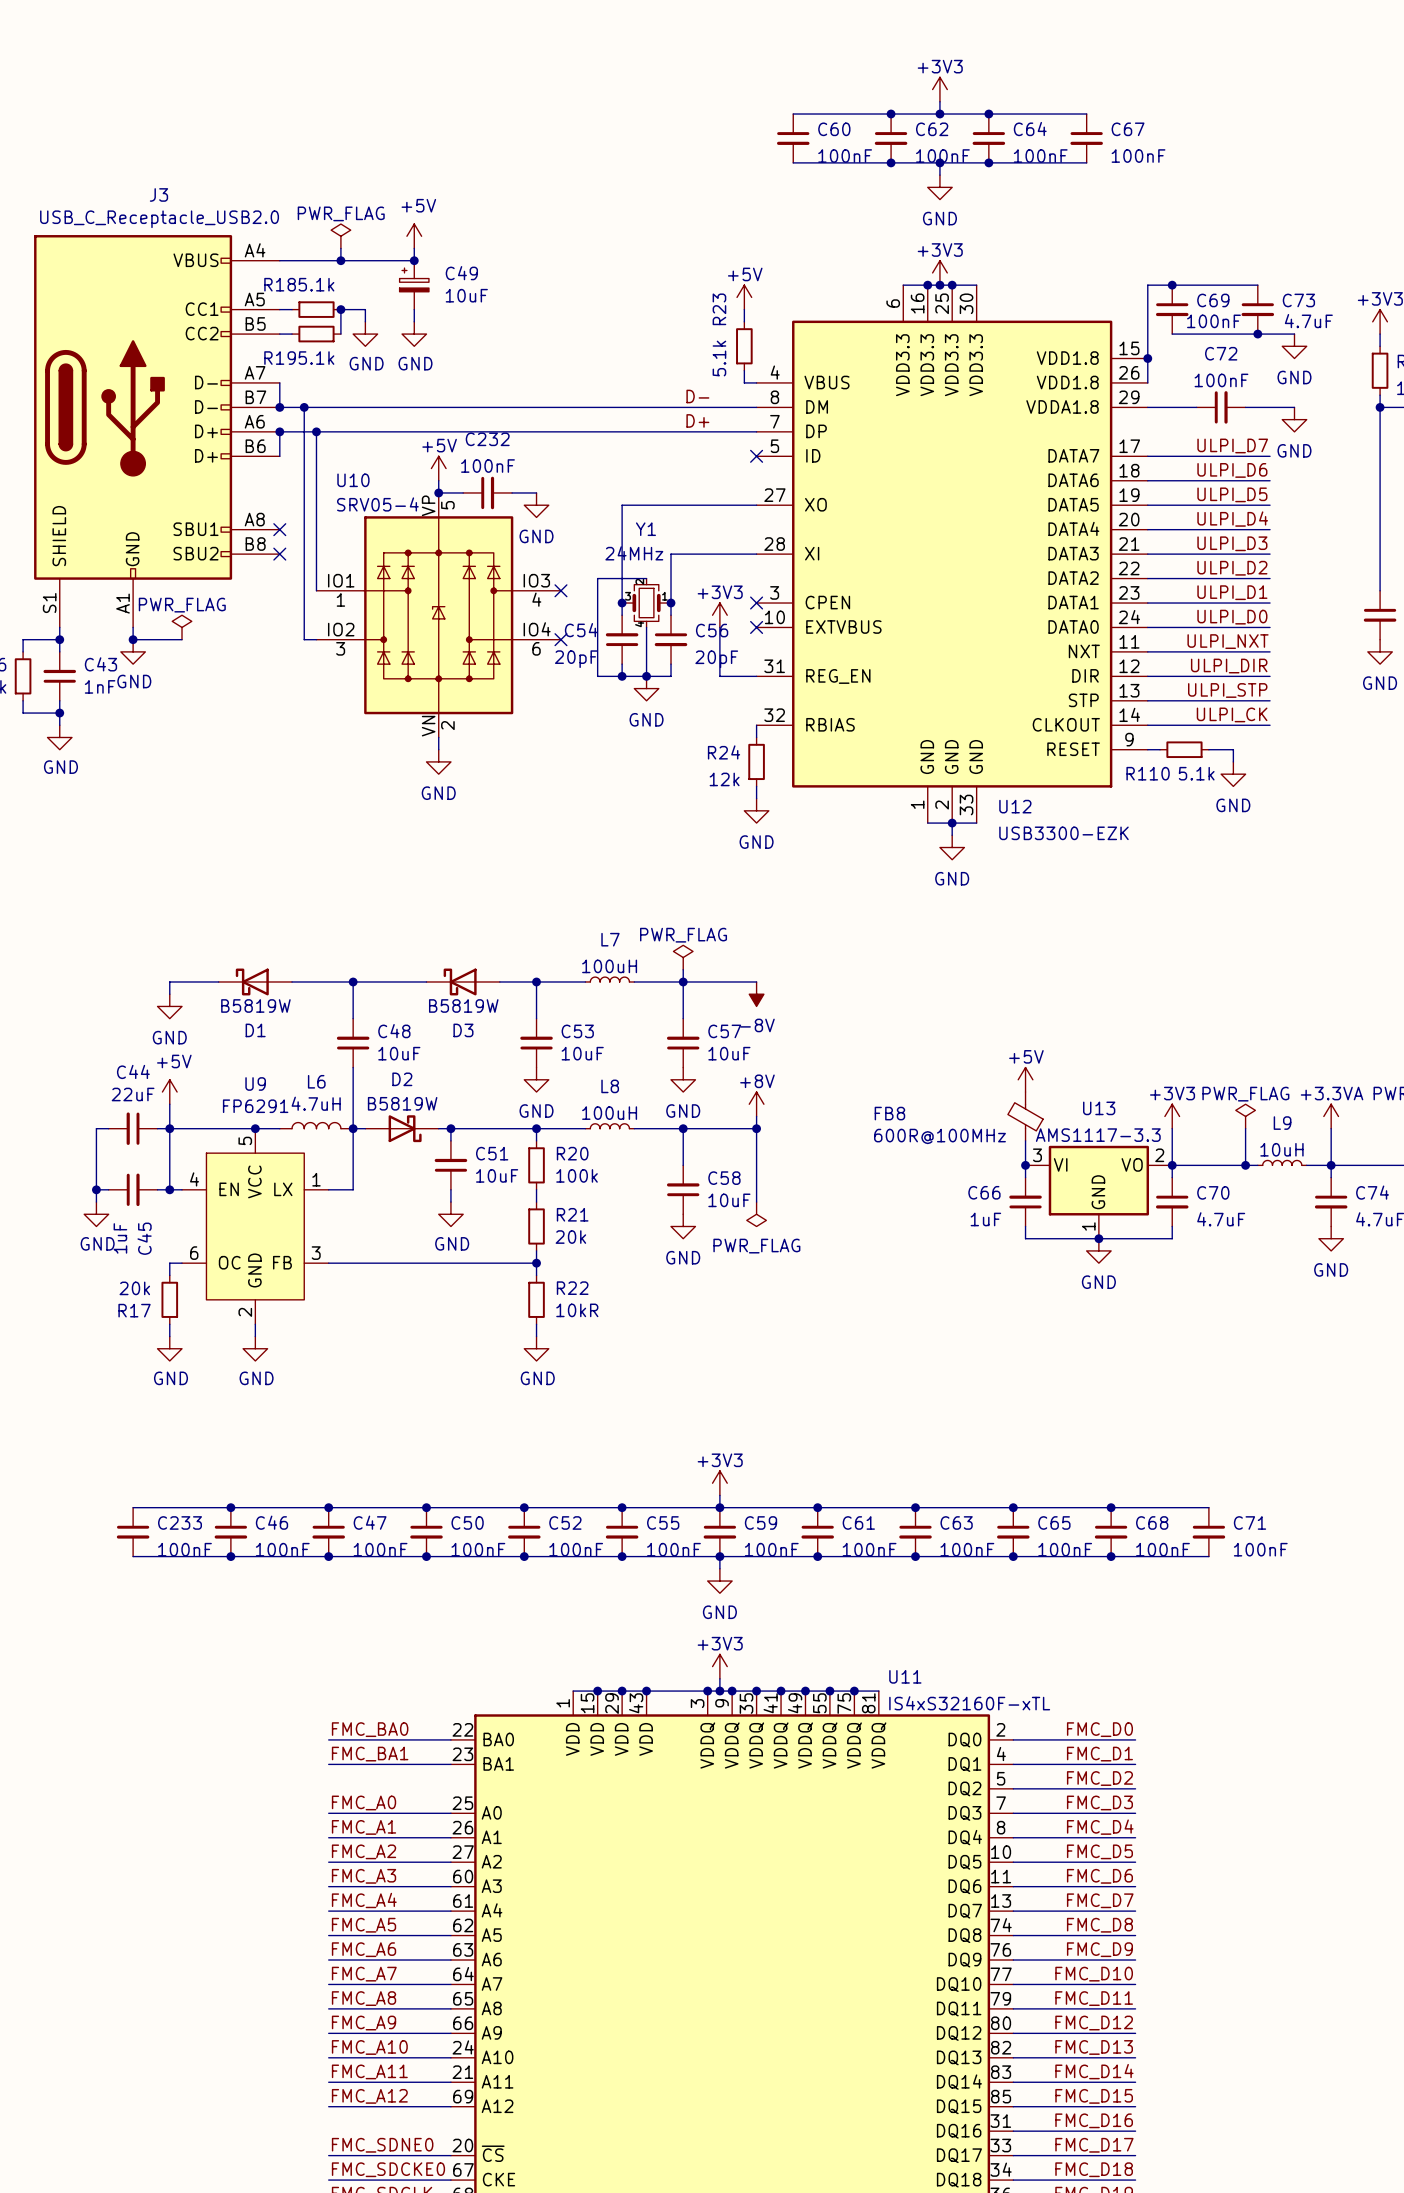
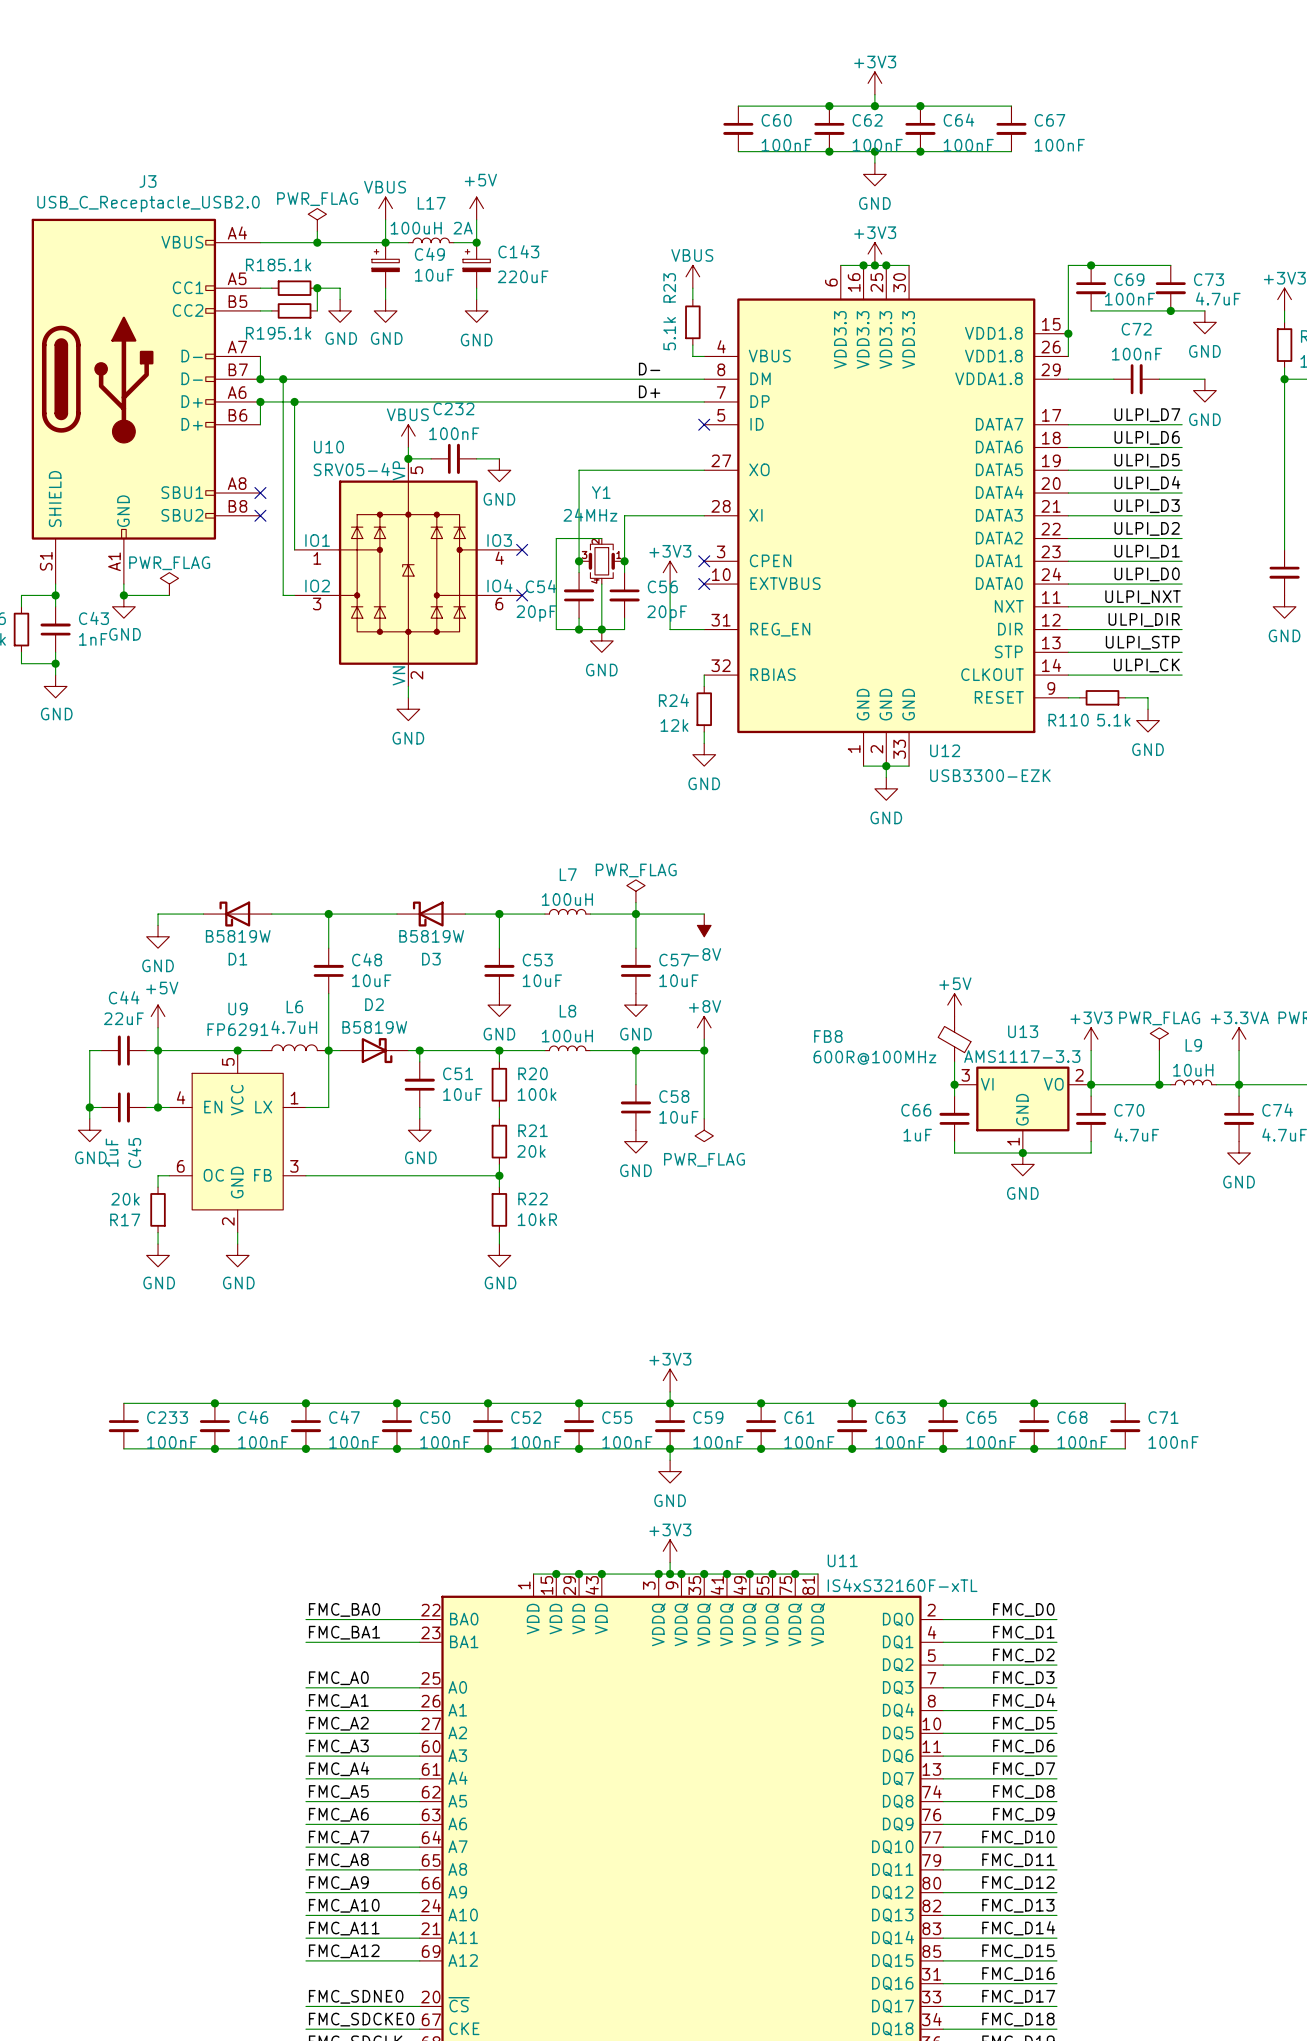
power symbol: none -> VBUS (385, 208)
power symbol position: +5V (414, 236) -> +5V (476, 208)
wire: none -> (476, 219) (476, 242) (453, 242)
L17: none -> 100uH 2A (431, 240)
wire: none -> (385, 242) (408, 242)
junction: none -> (476, 242)
C143: none -> 220uF (476, 265)
power symbol: +5V (744, 297) -> VBUS (692, 276)
wire: none -> (476, 288) (476, 299)
power symbol: none -> GND (476, 310)
power symbol: +5V (438, 468) -> VBUS (408, 436)

